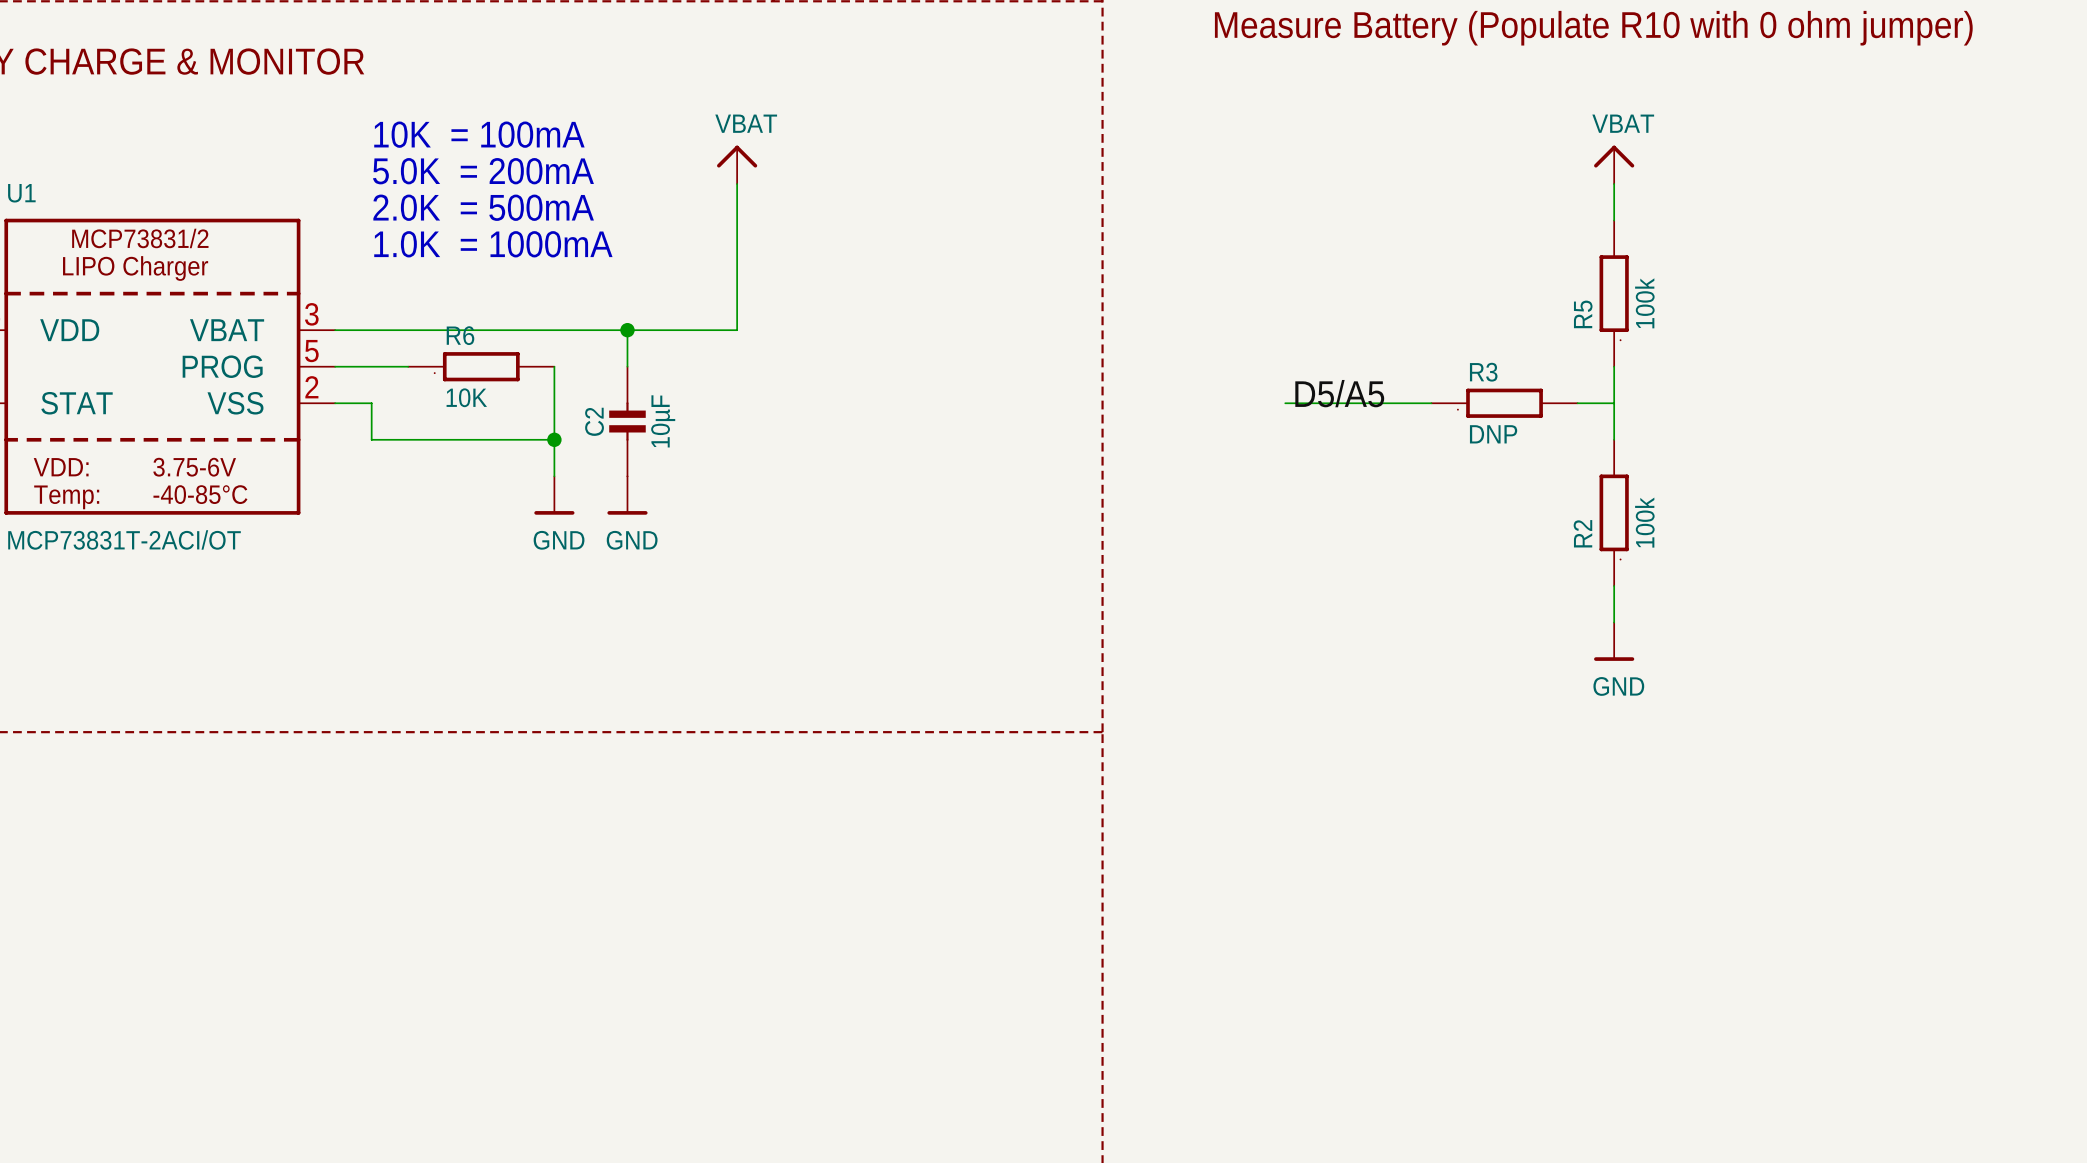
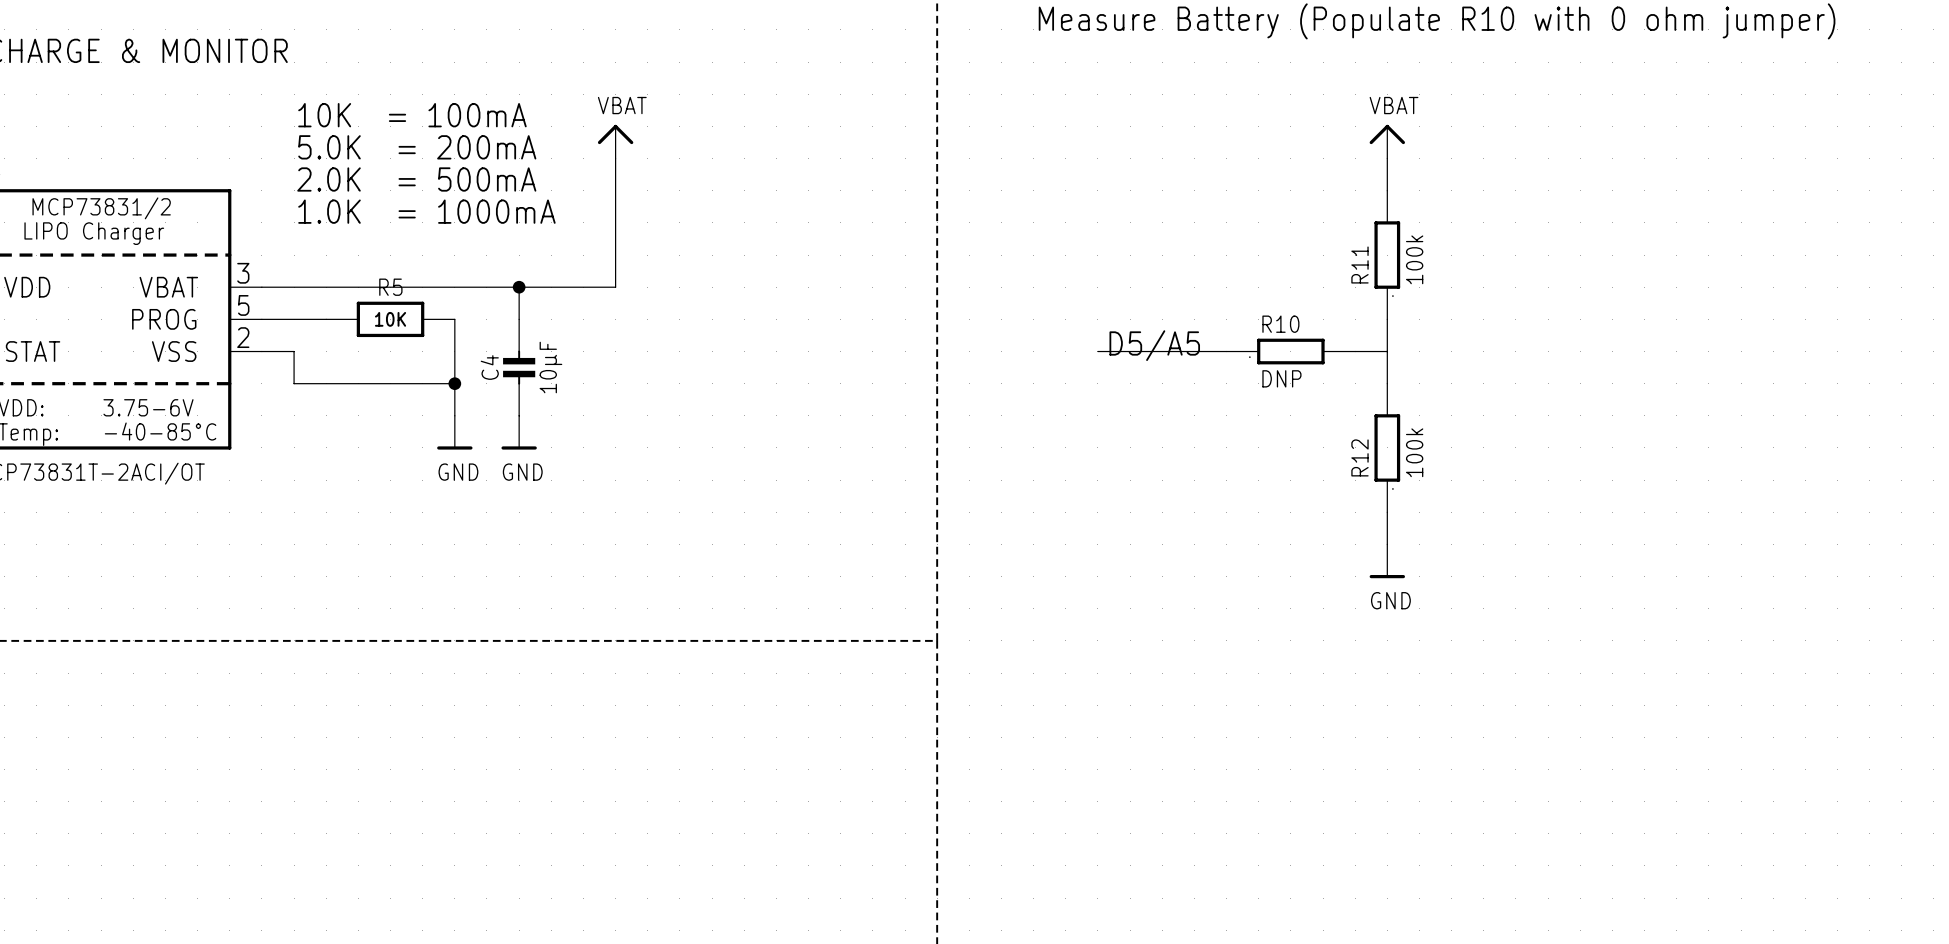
R5 name: R5 (1583, 314) -> R11 (1359, 265)
R6: 10K (481, 366) -> none
R5: none -> 10K (390, 319)
R3 name: R3 (1483, 372) -> R10 (1280, 324)
C2 name: C2 (594, 421) -> C4 (489, 367)
R2 name: R2 (1582, 533) -> R12 (1359, 457)

